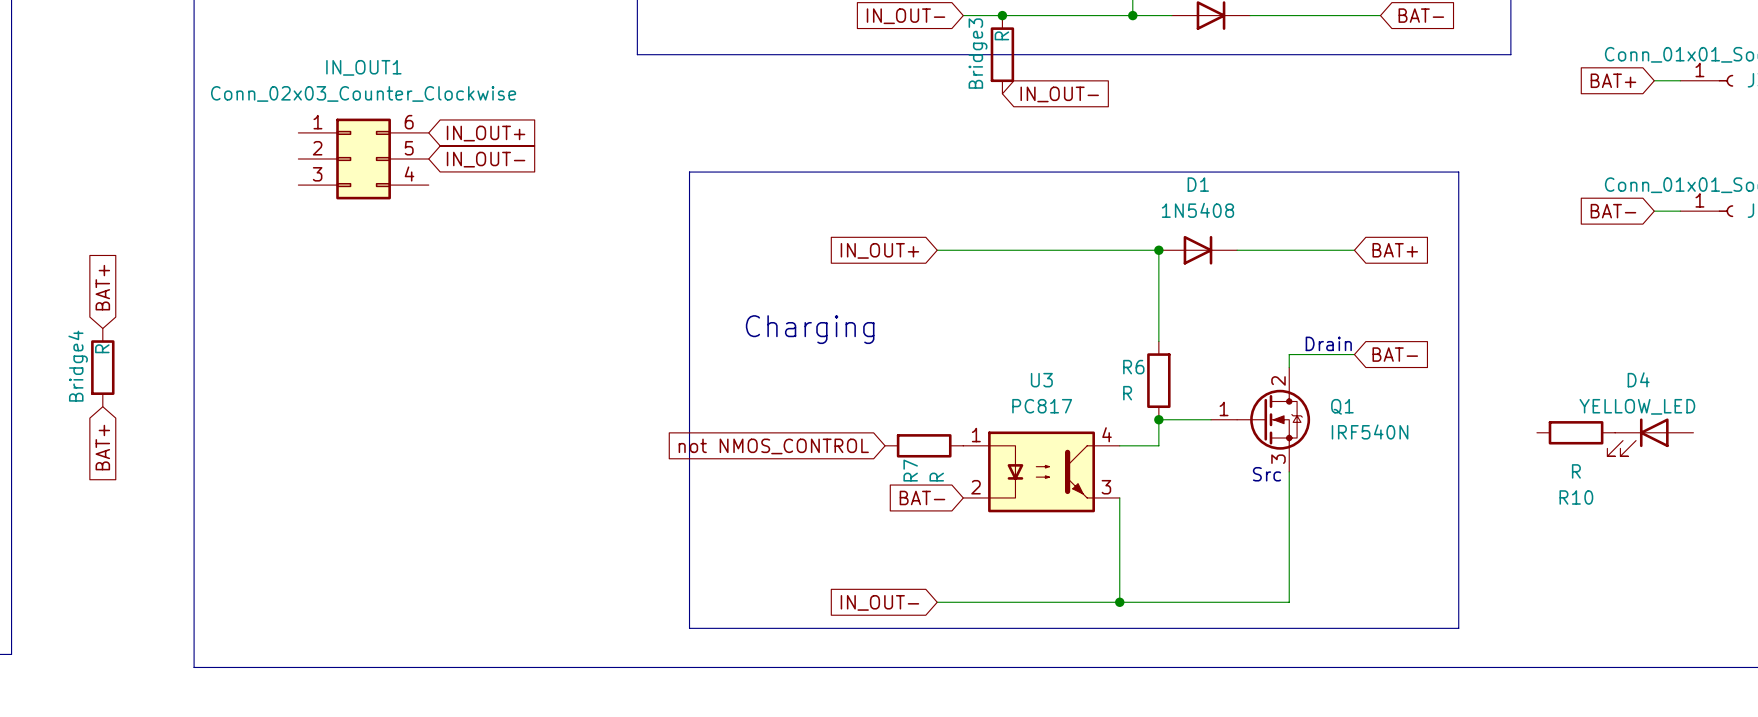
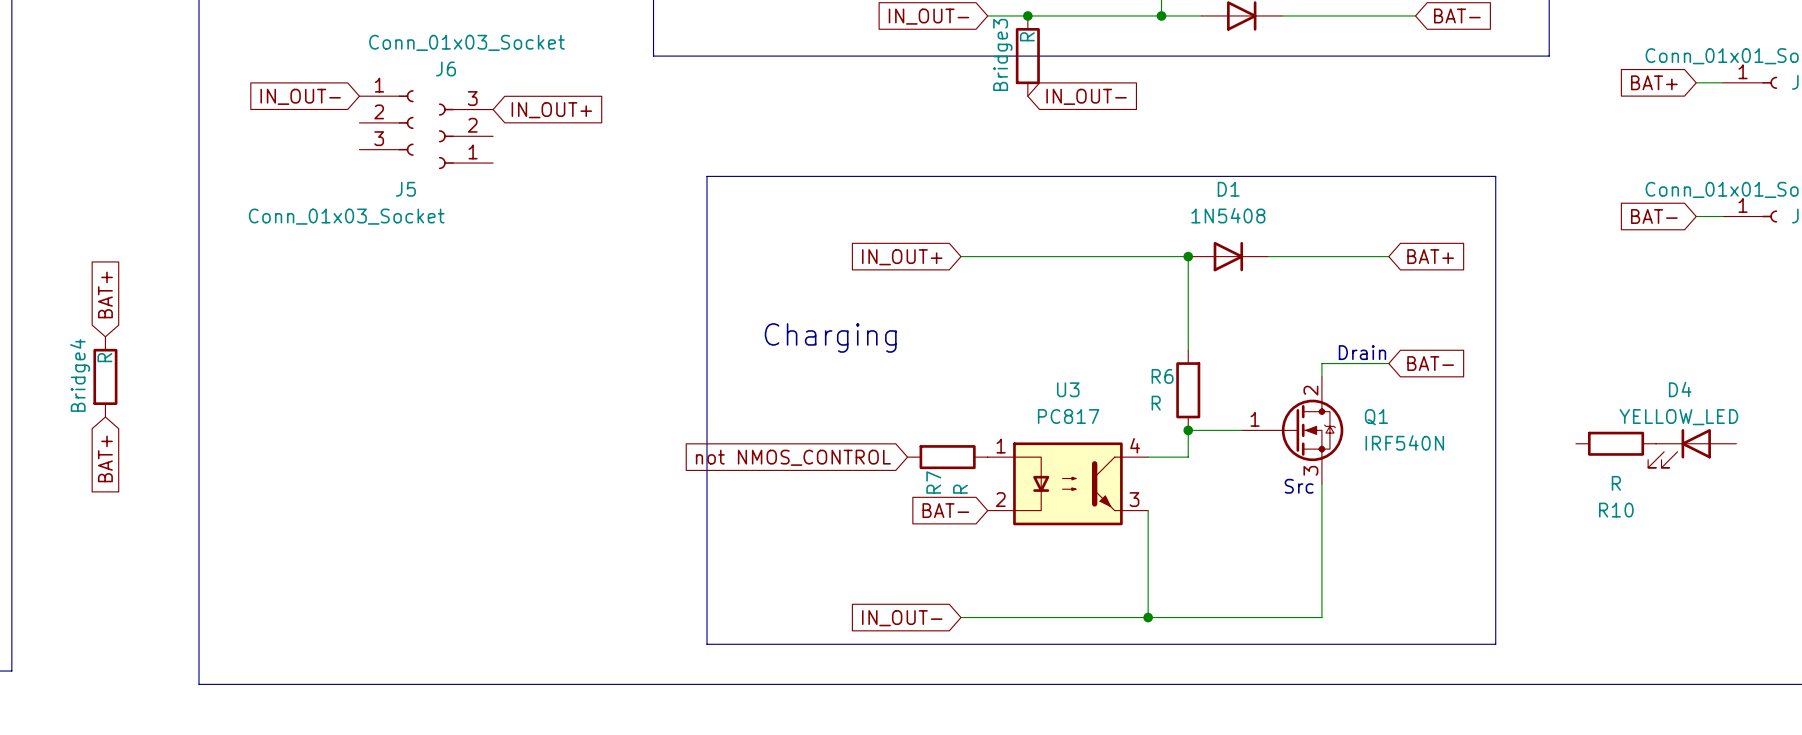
J5: none -> Conn_01x03_Socket (386, 122)
J6: none -> Conn_01x03_Socket (465, 136)
global label position: IN_OUT+ (486, 133) -> IN_OUT+ (551, 110)
IN_OUT1: Conn_02x03_Counter_Clockwise (363, 159) -> none
global label rotation: 0° (486, 159) -> 180° (300, 96)
global label position: IN_OUT- (486, 159) -> IN_OUT- (300, 96)

